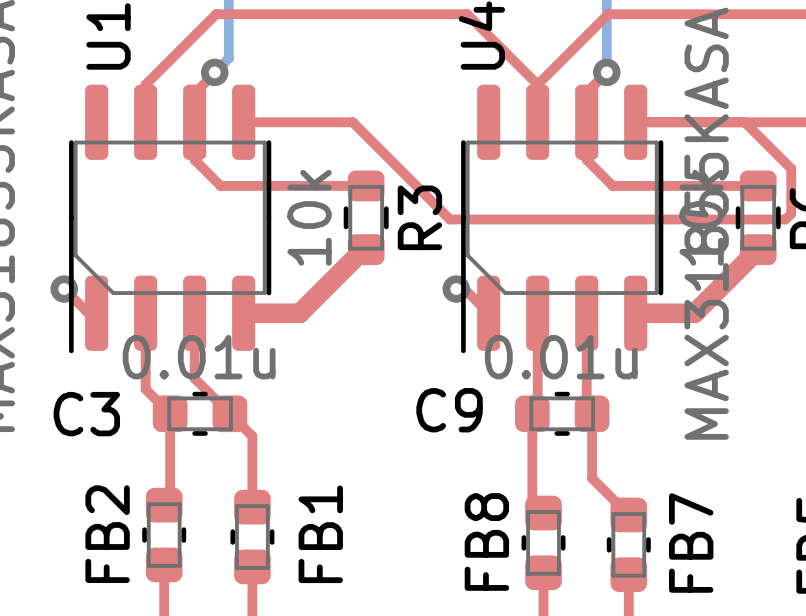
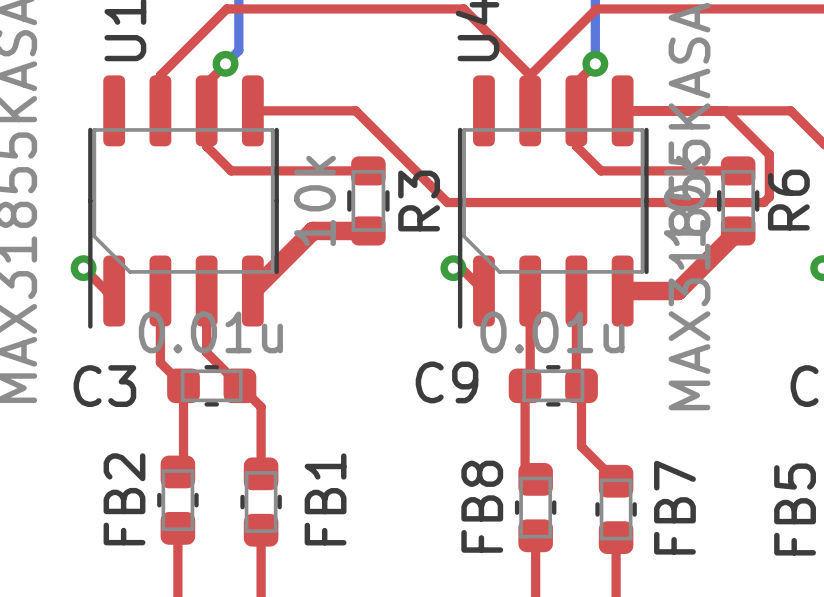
top track: (363, 249) (299, 313) (243, 313) -> (365, 230) (312, 230) (252, 291)

